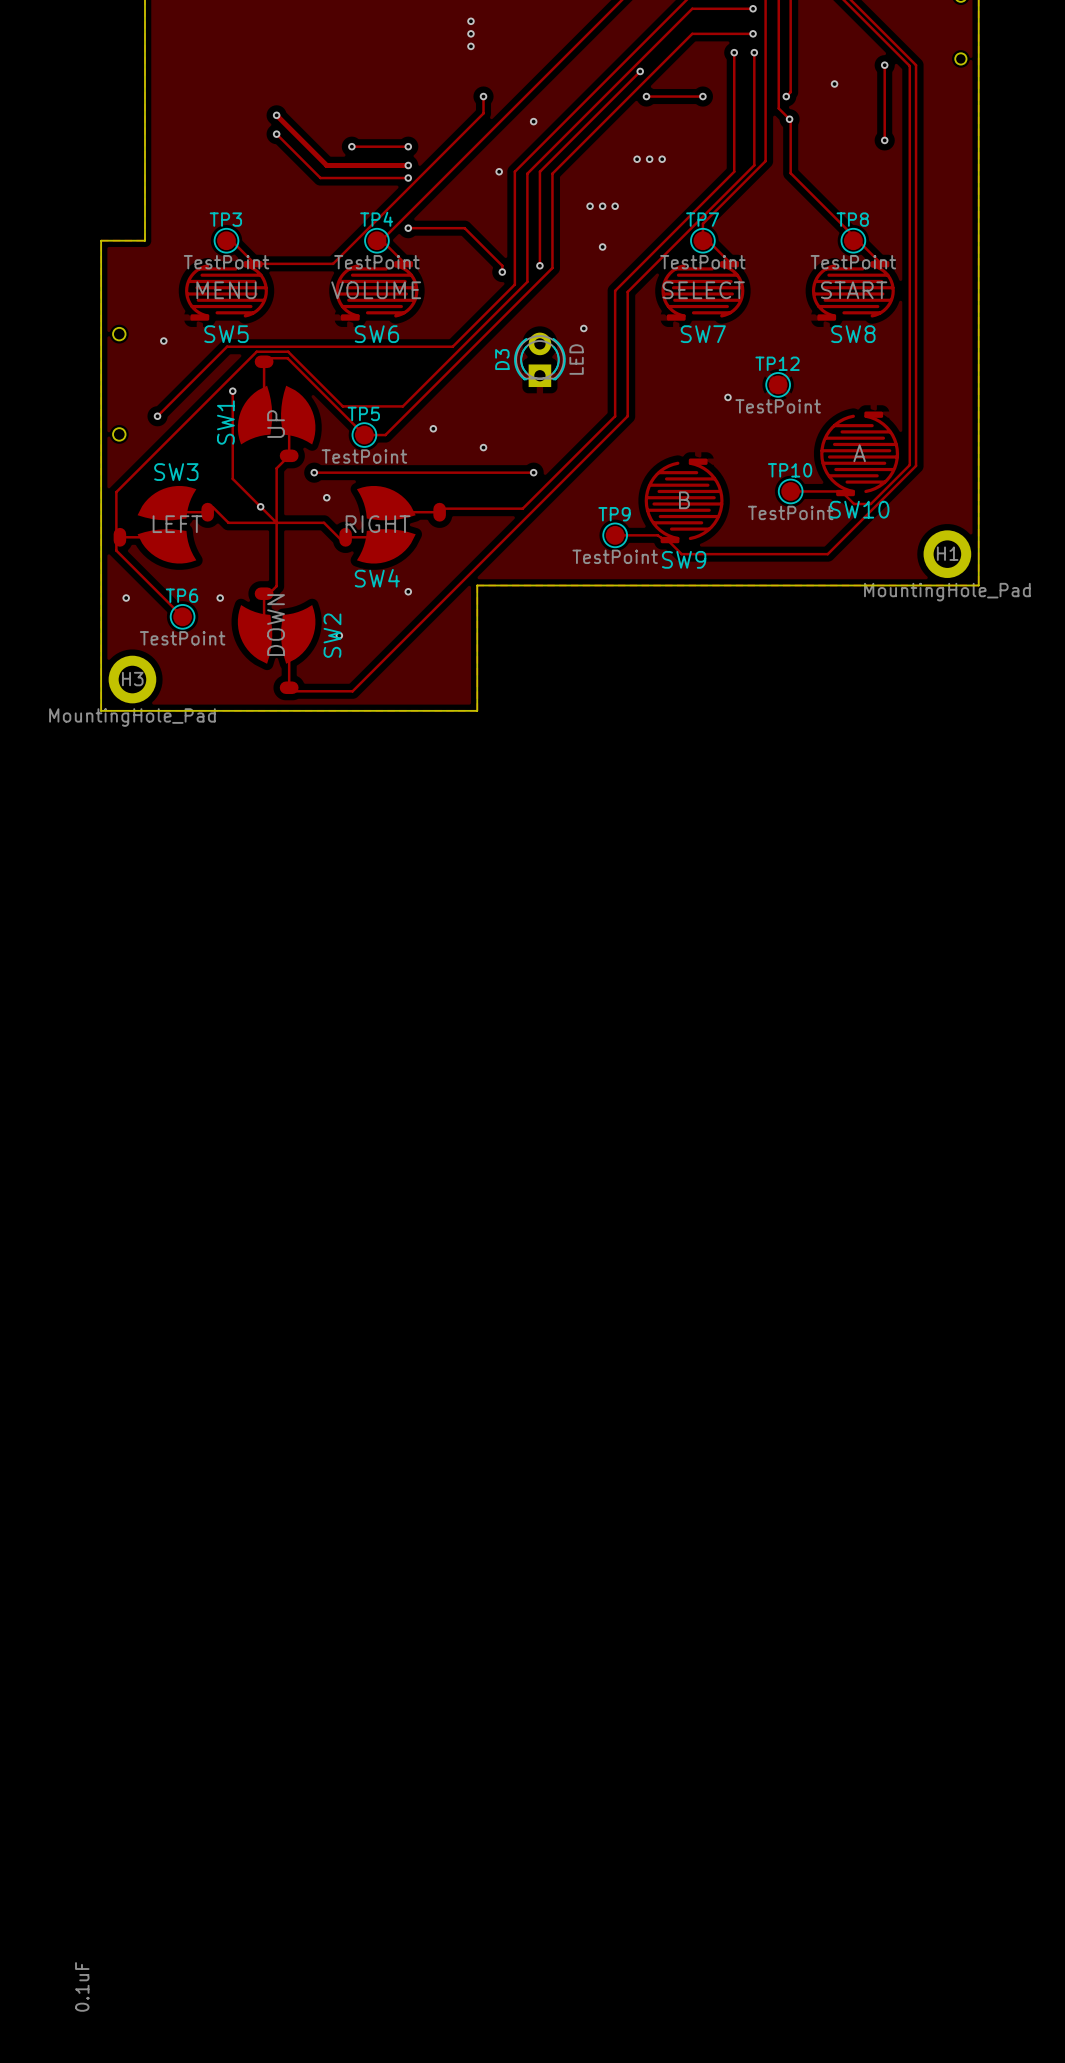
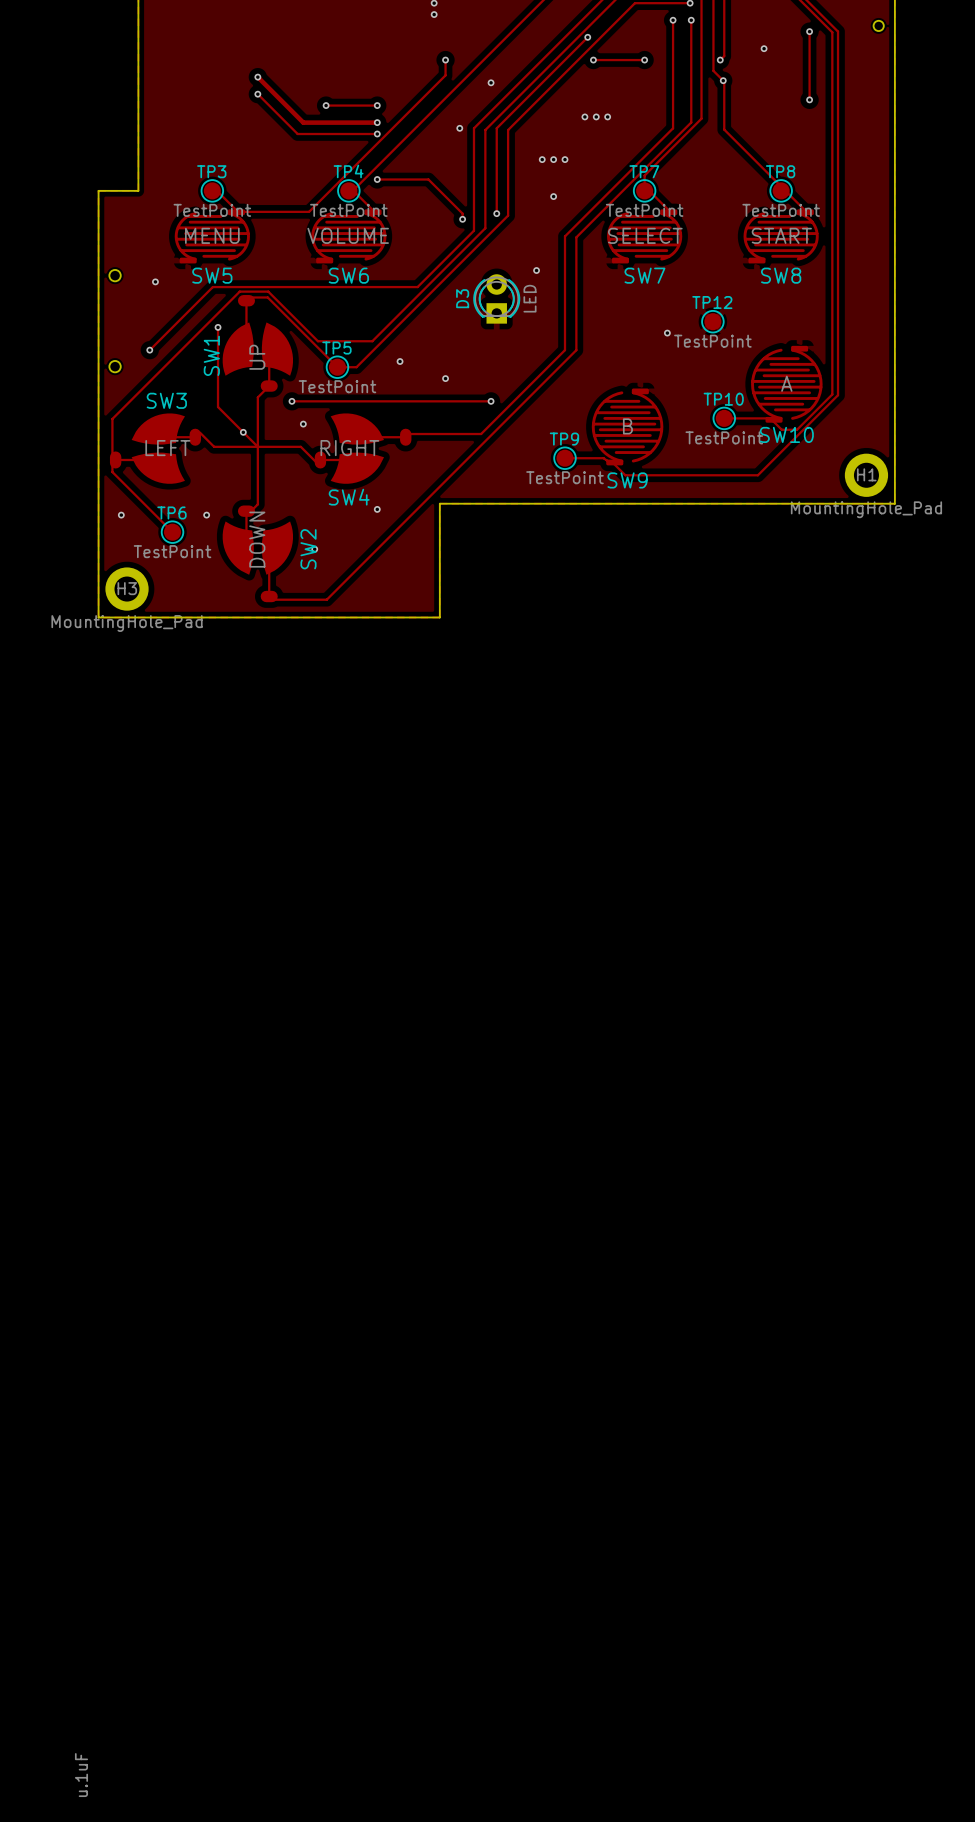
part value: 0.1uF (82, 1986) -> u.1uF (81, 1775)

